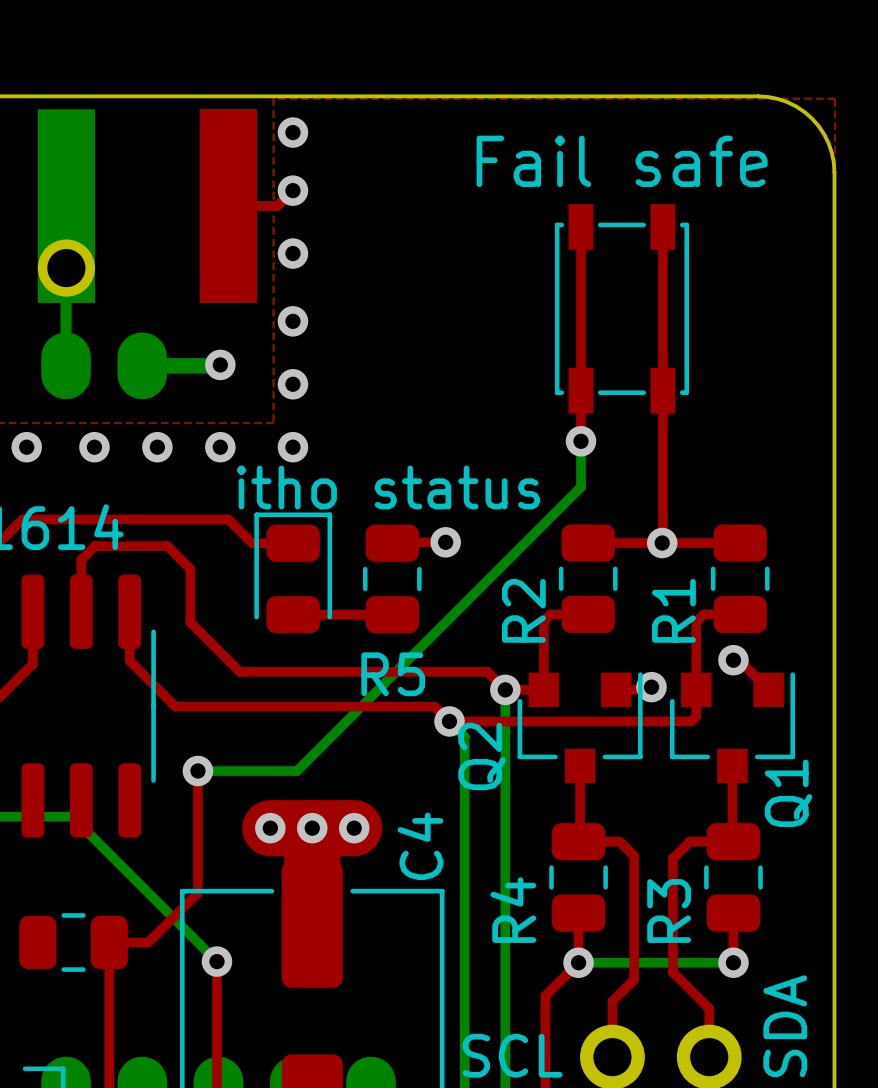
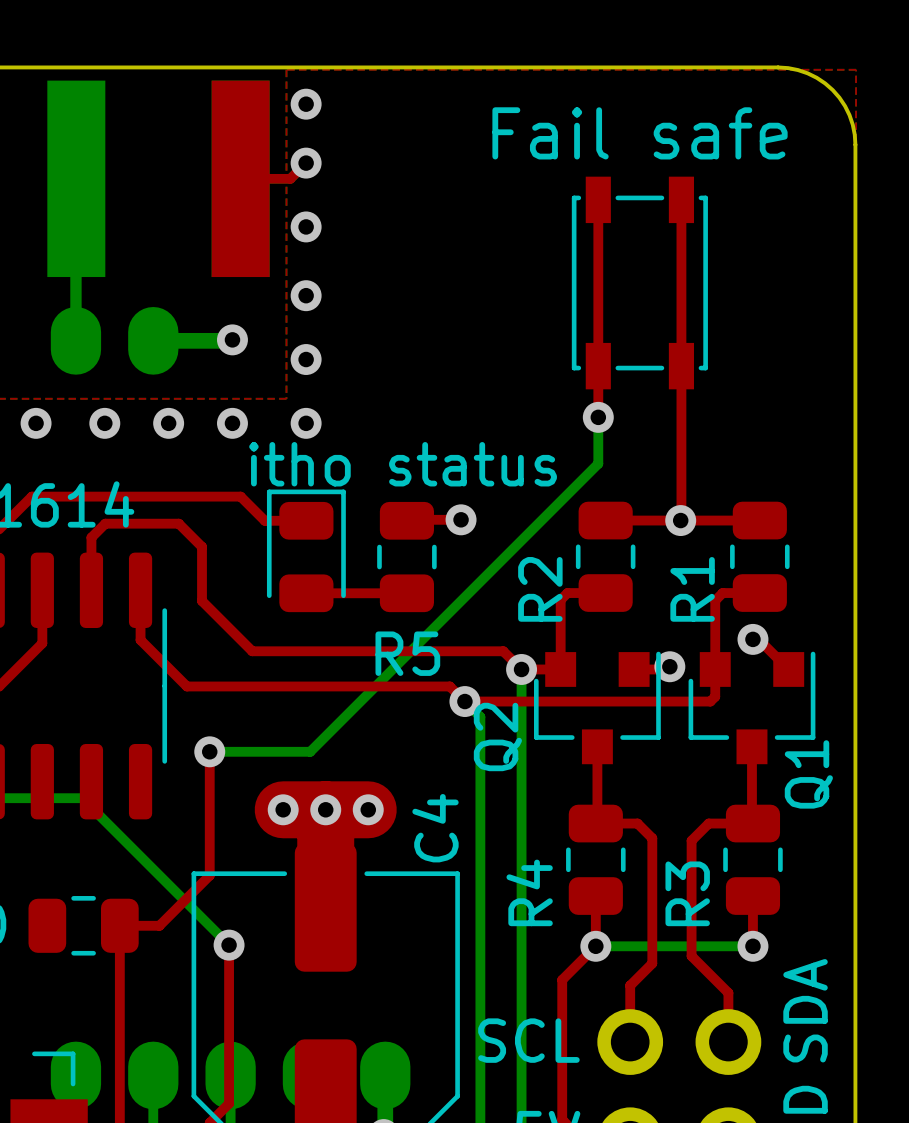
part: (66, 268) -> none

